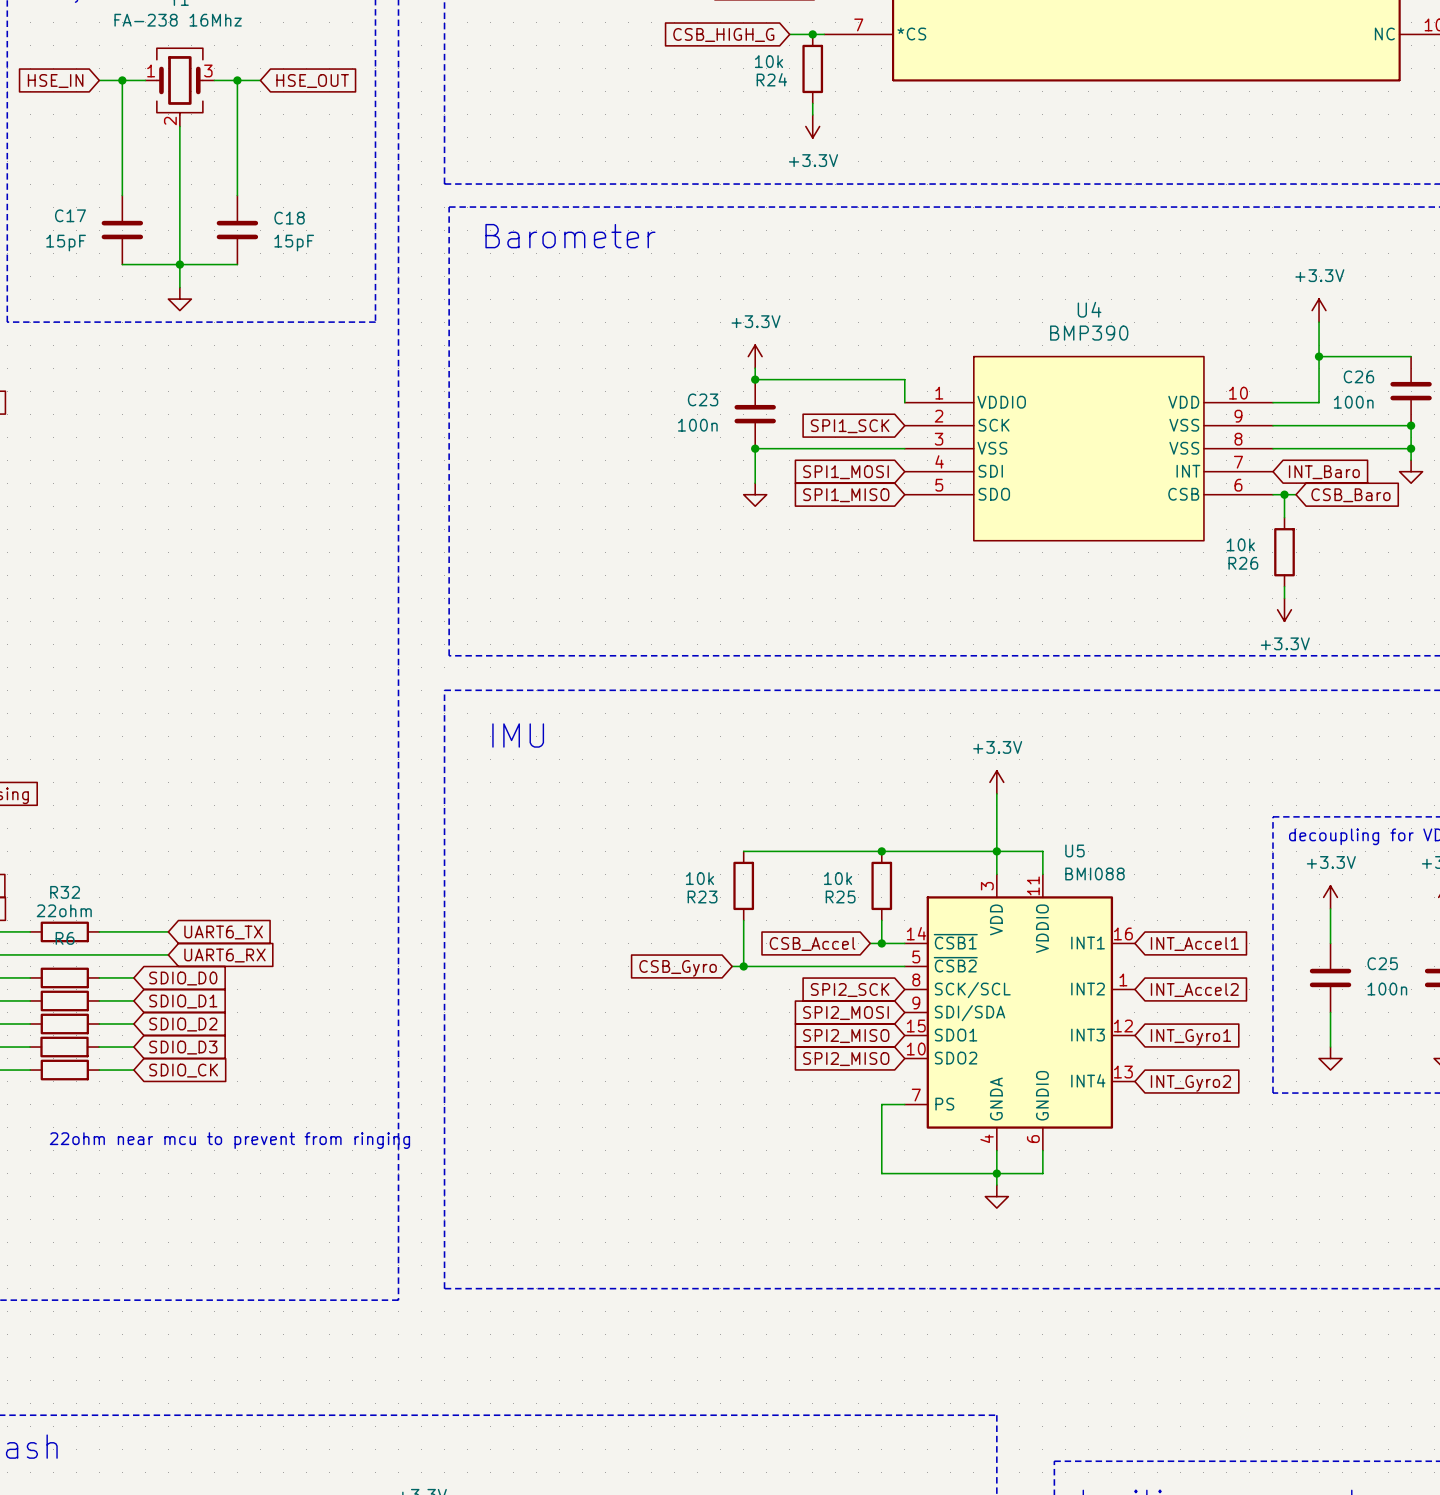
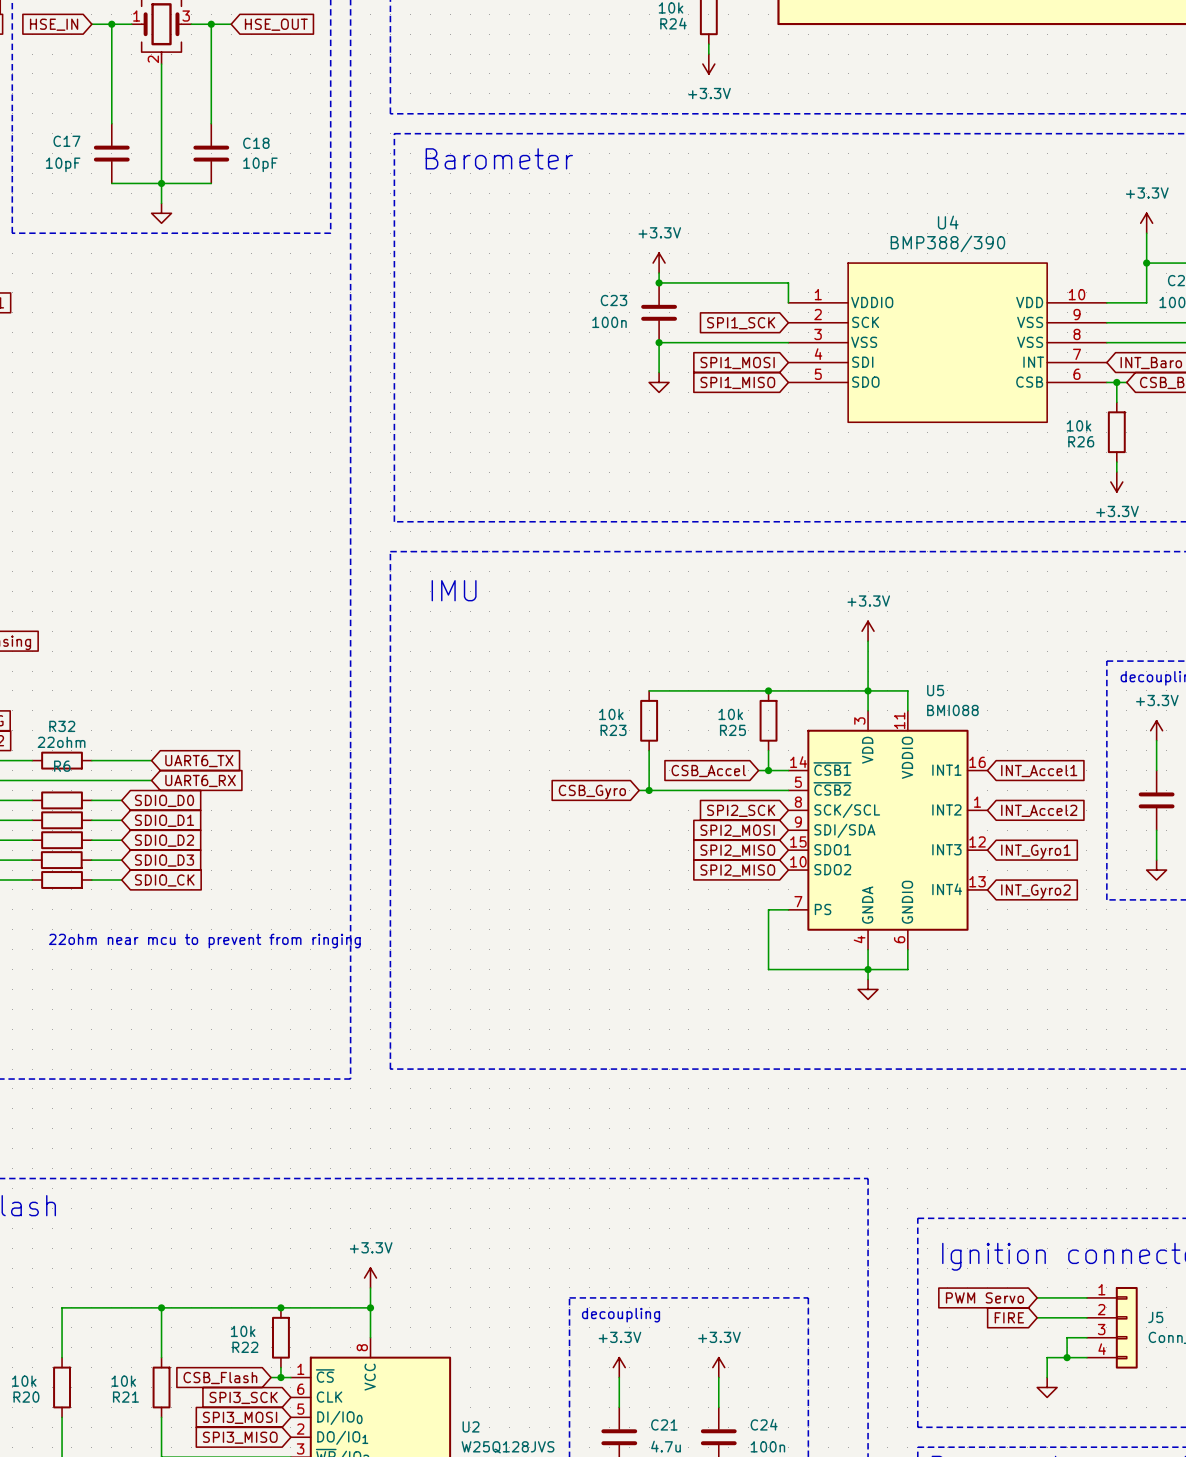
C17 value: 15pF (66, 243) -> 10pF (63, 164)
C18 value: 15pF (294, 243) -> 10pF (260, 164)
U4 value: BMP390 (1089, 333) -> BMP388/390 (947, 243)

